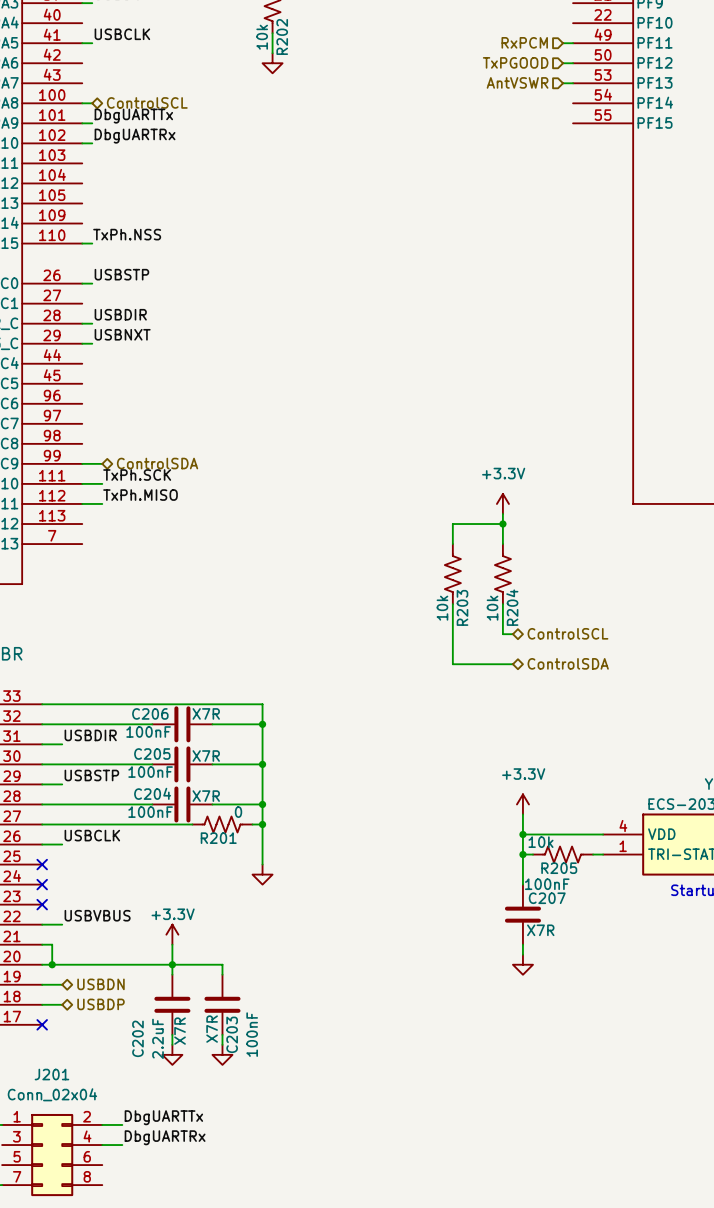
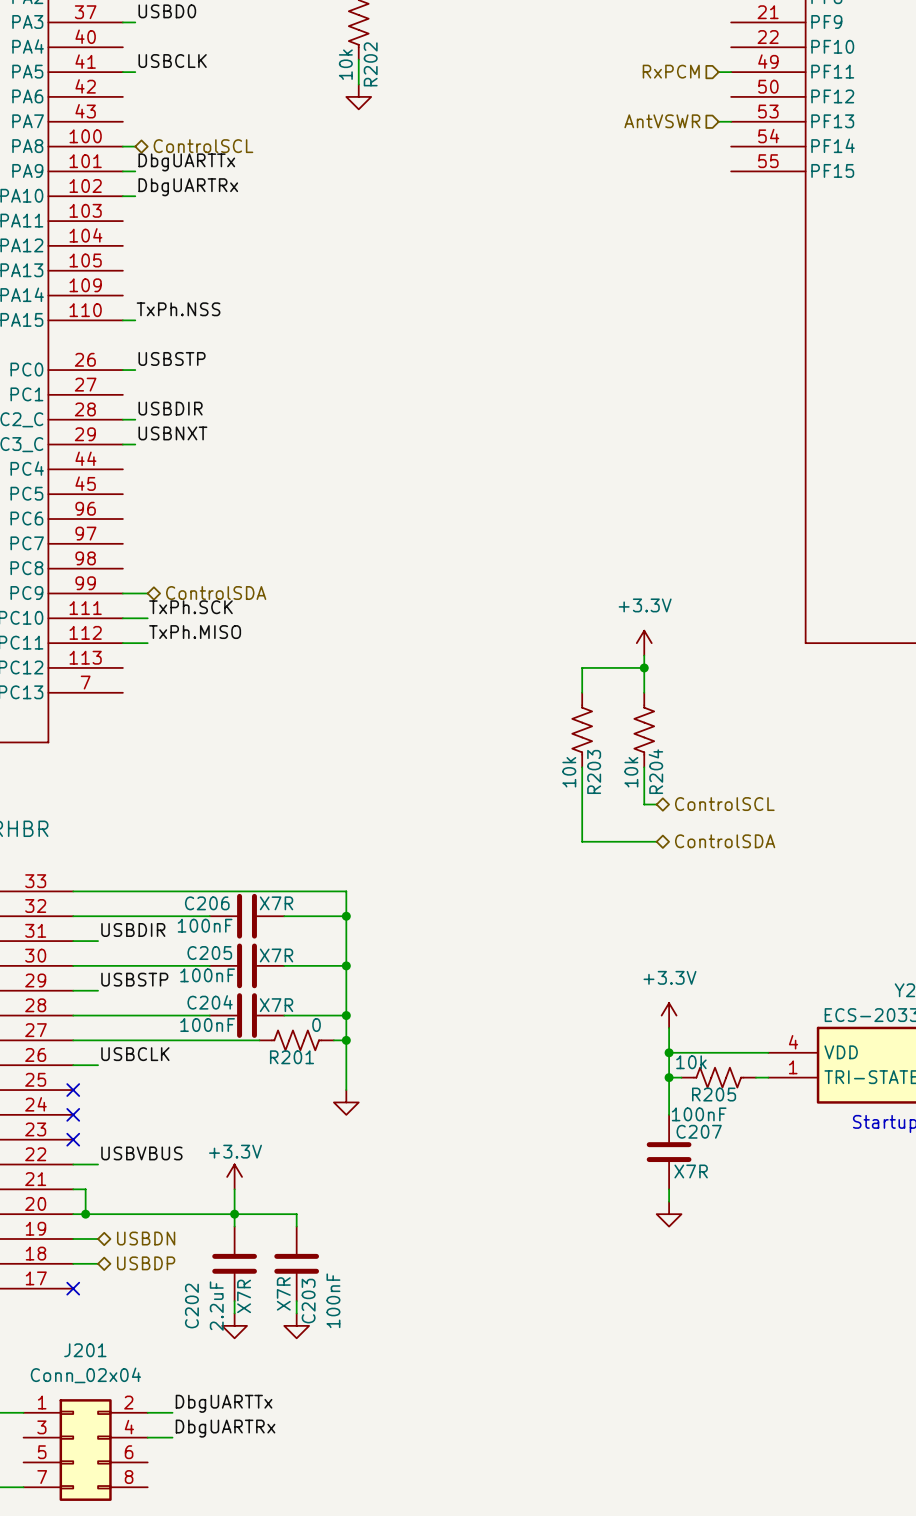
hierarchical label: TxPGOOD (515, 62) -> none
wire: (563, 63) (573, 63) -> none

